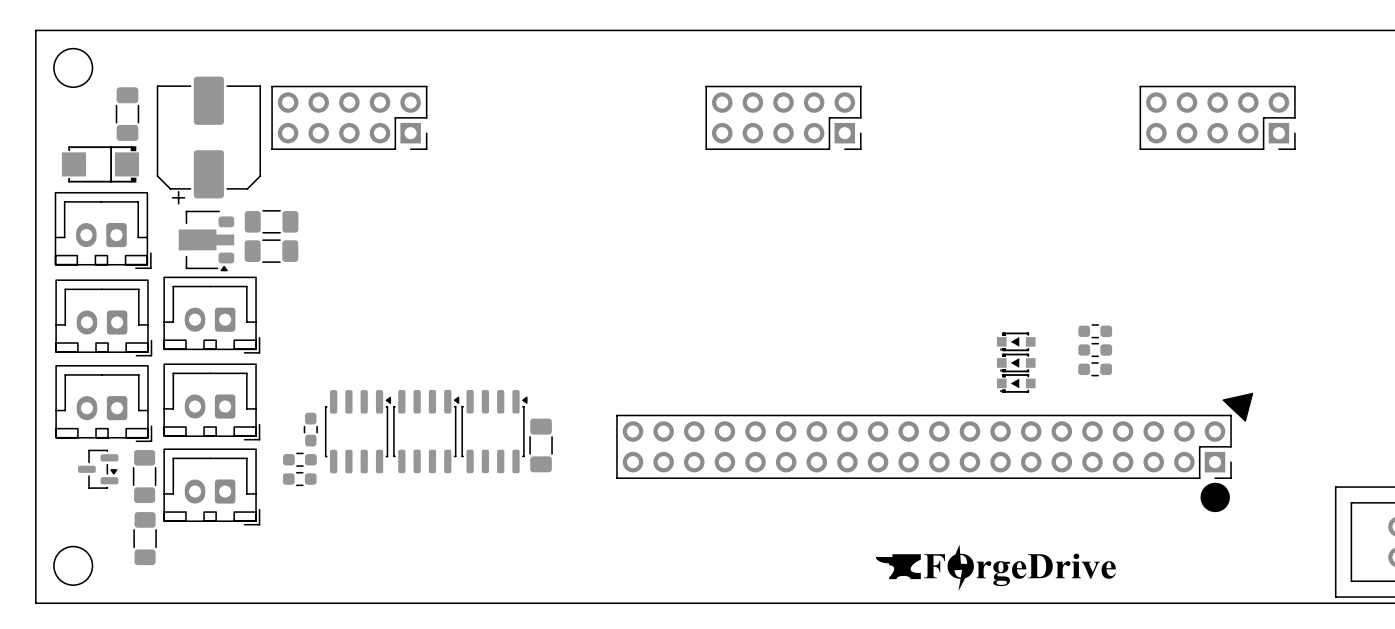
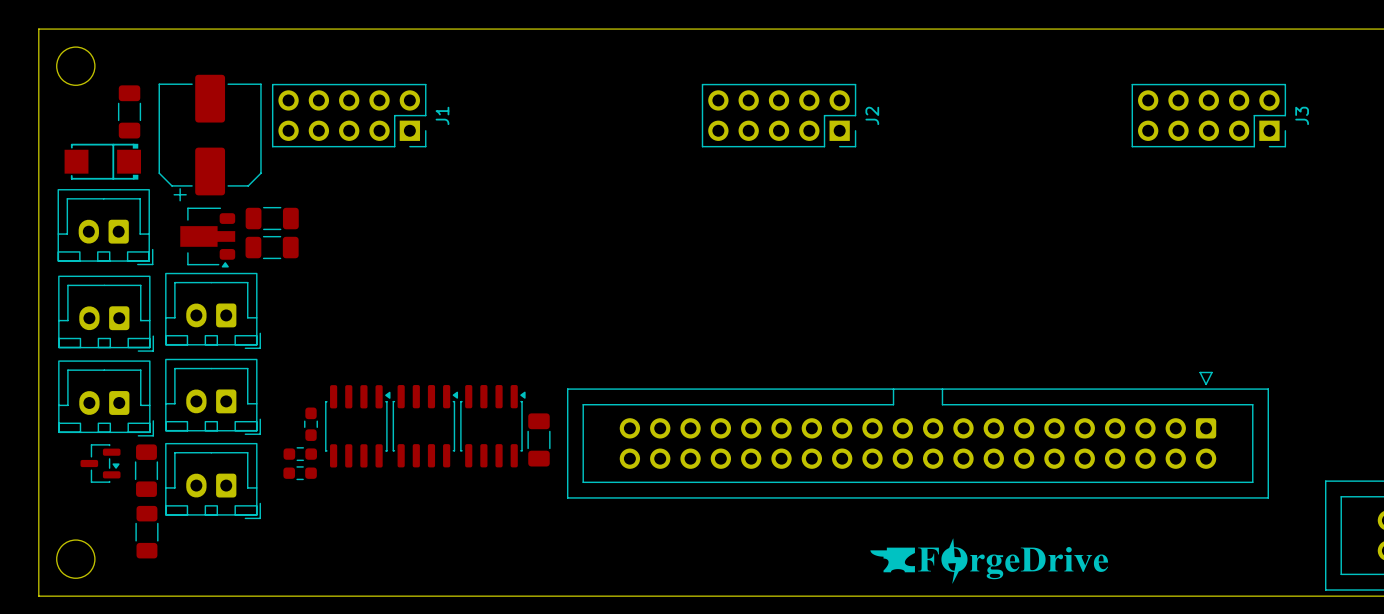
J1 name: none -> J1 (442, 115)
J2 name: none -> J2 (872, 115)
J3 name: none -> J3 (1302, 115)
part: (1095, 331) -> none
part: (1016, 341) -> none
part: (1095, 350) -> none
part: (1016, 362) -> none
part: (1095, 369) -> none
part: (1016, 383) -> none
drawing: [1222, 392, 1254, 422] -> none
part footprint: [616, 414, 1232, 479] -> [566, 371, 1270, 499]
drawing: [1200, 482, 1230, 513] -> none

